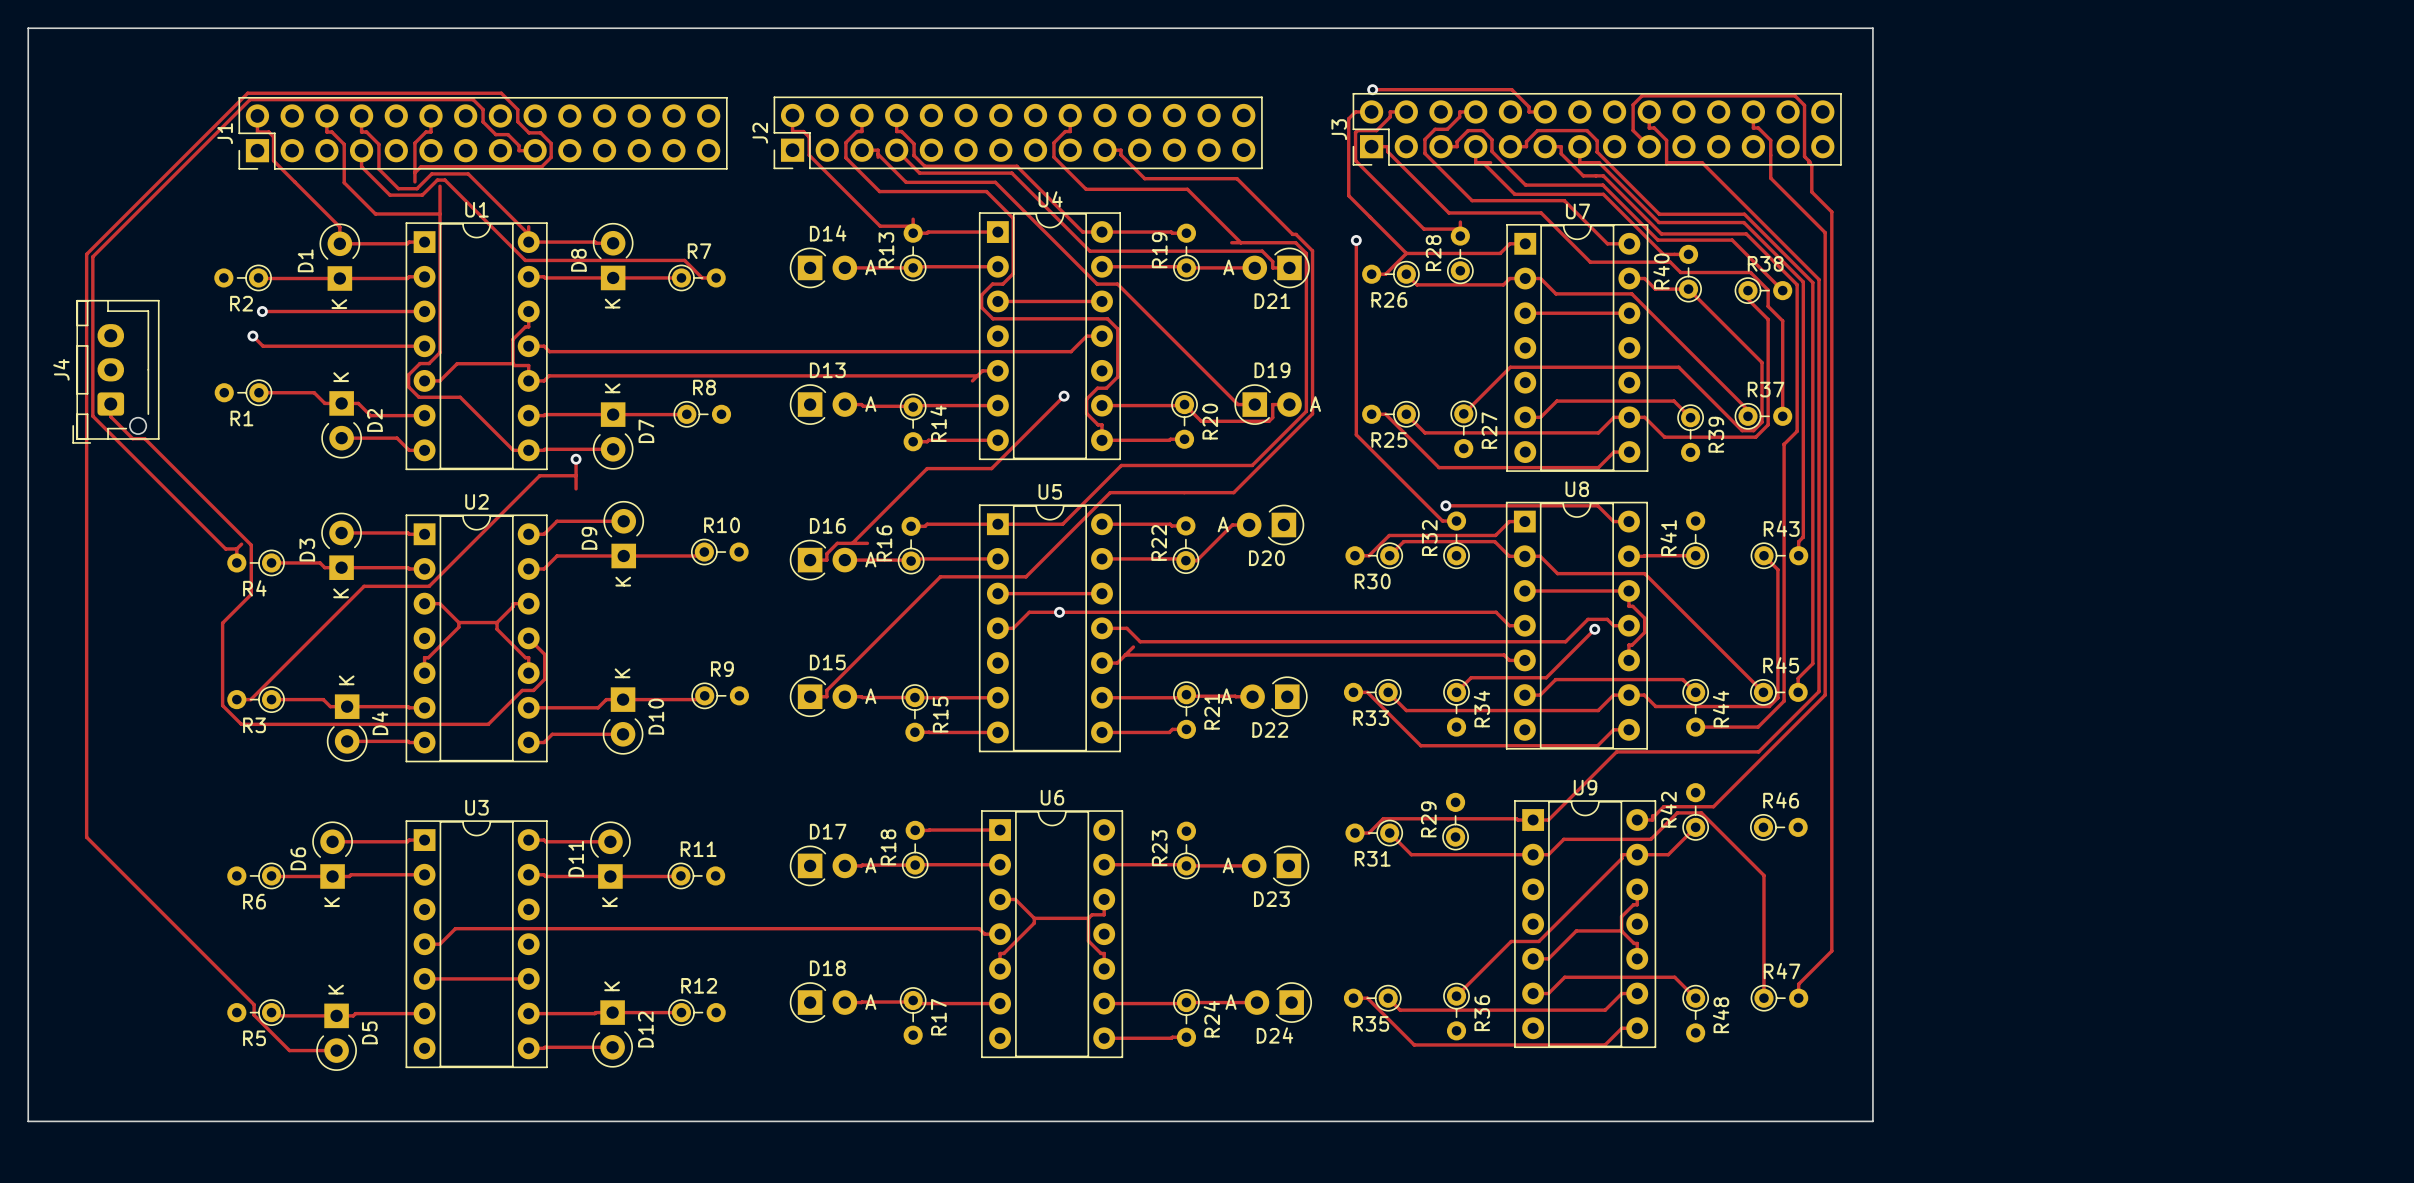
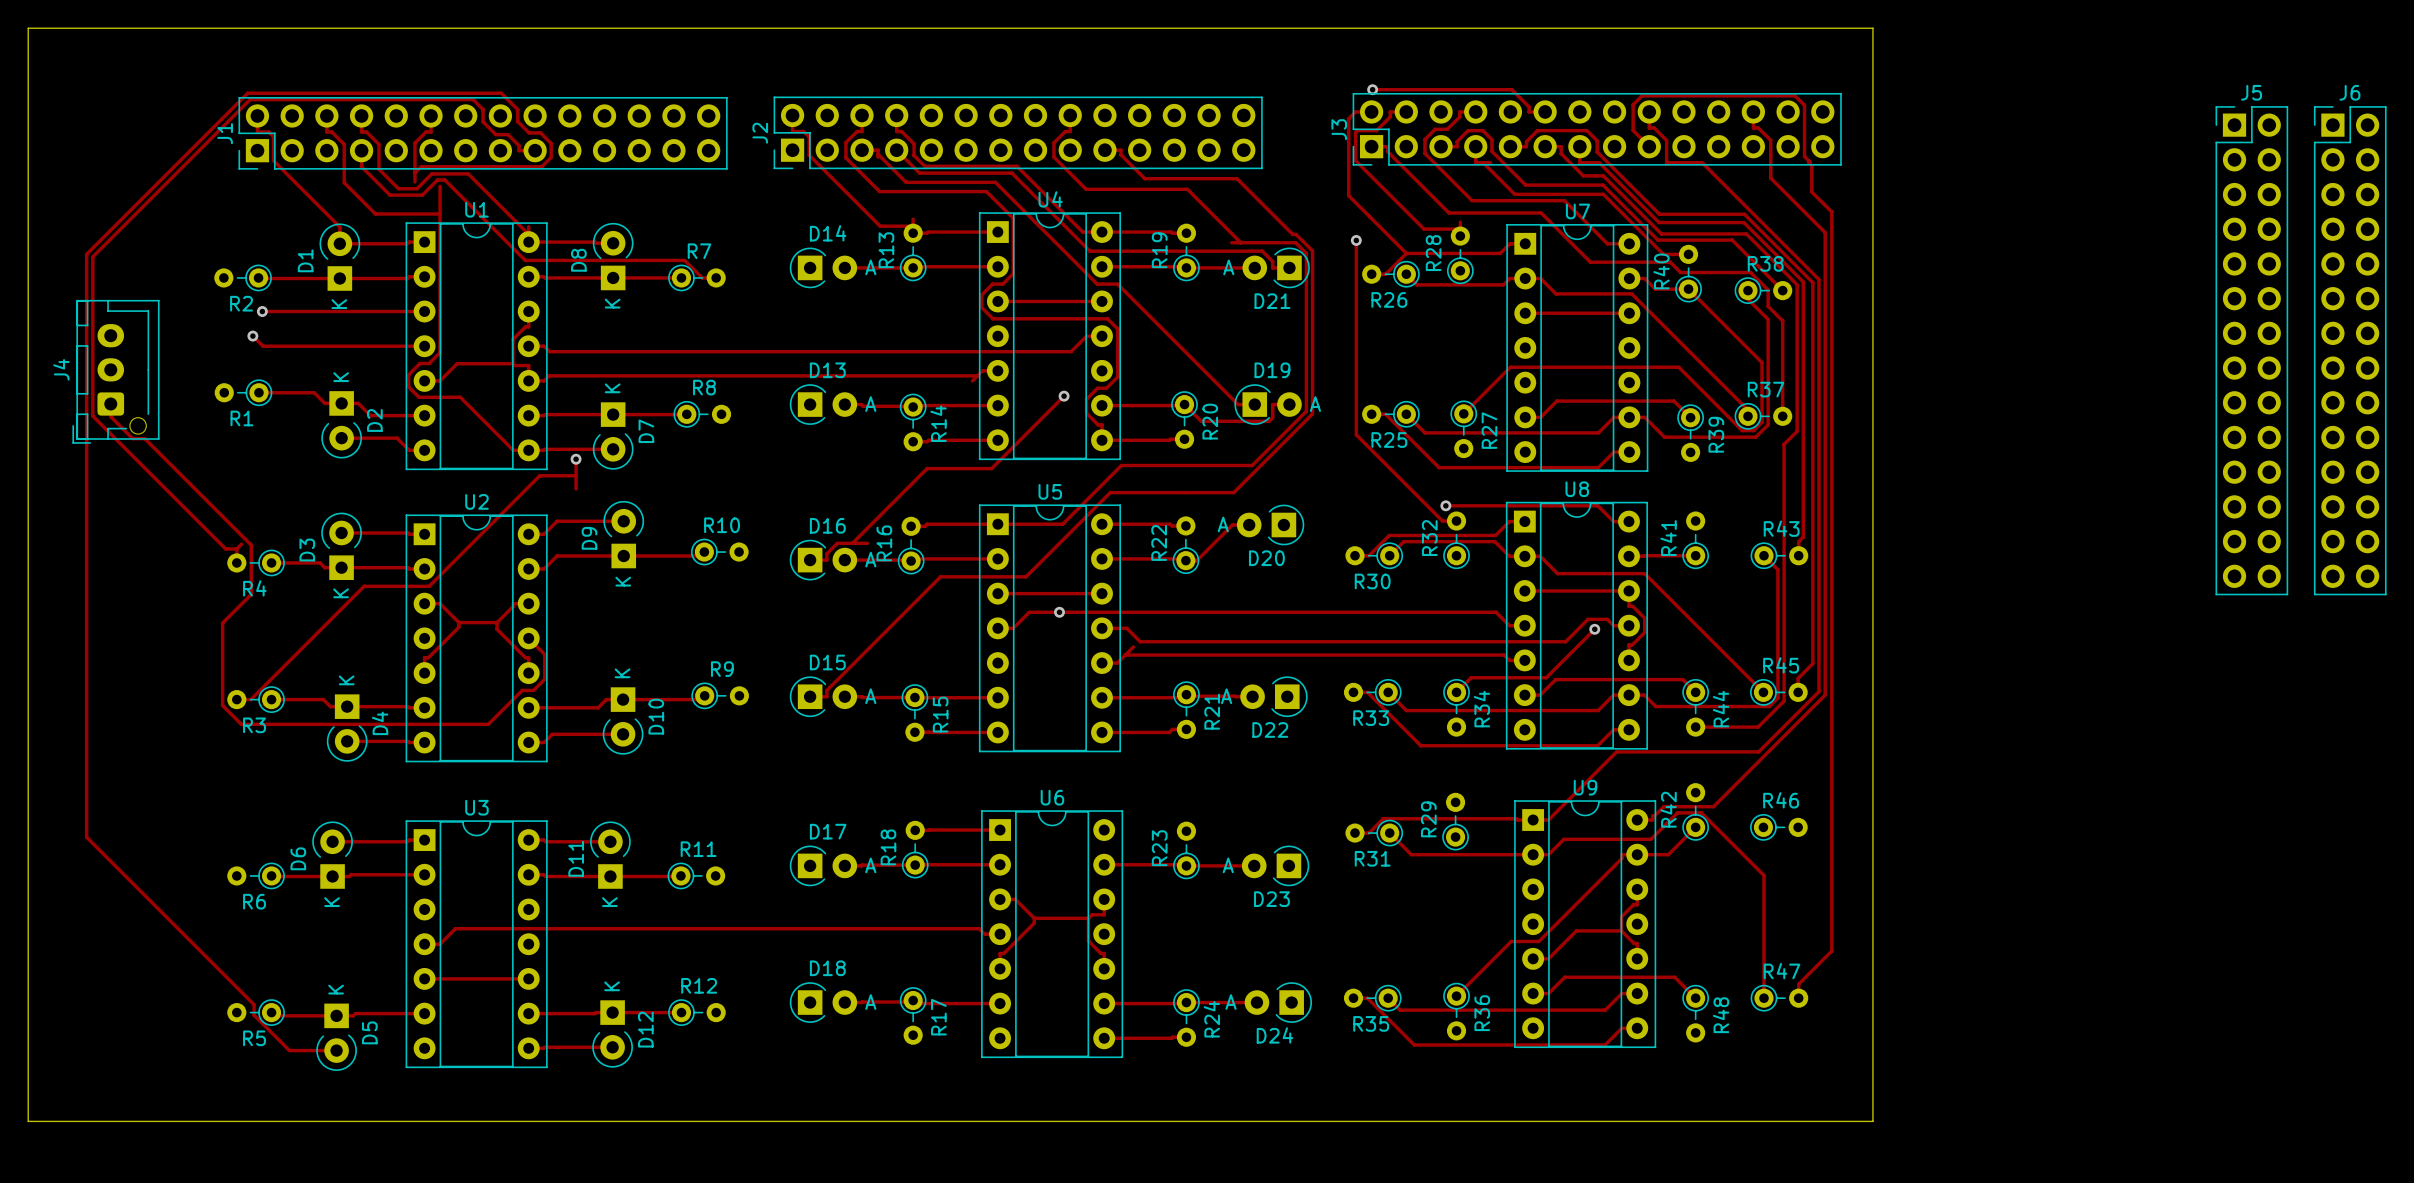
J5: none -> (2251, 350)
J6: none -> (2350, 350)

